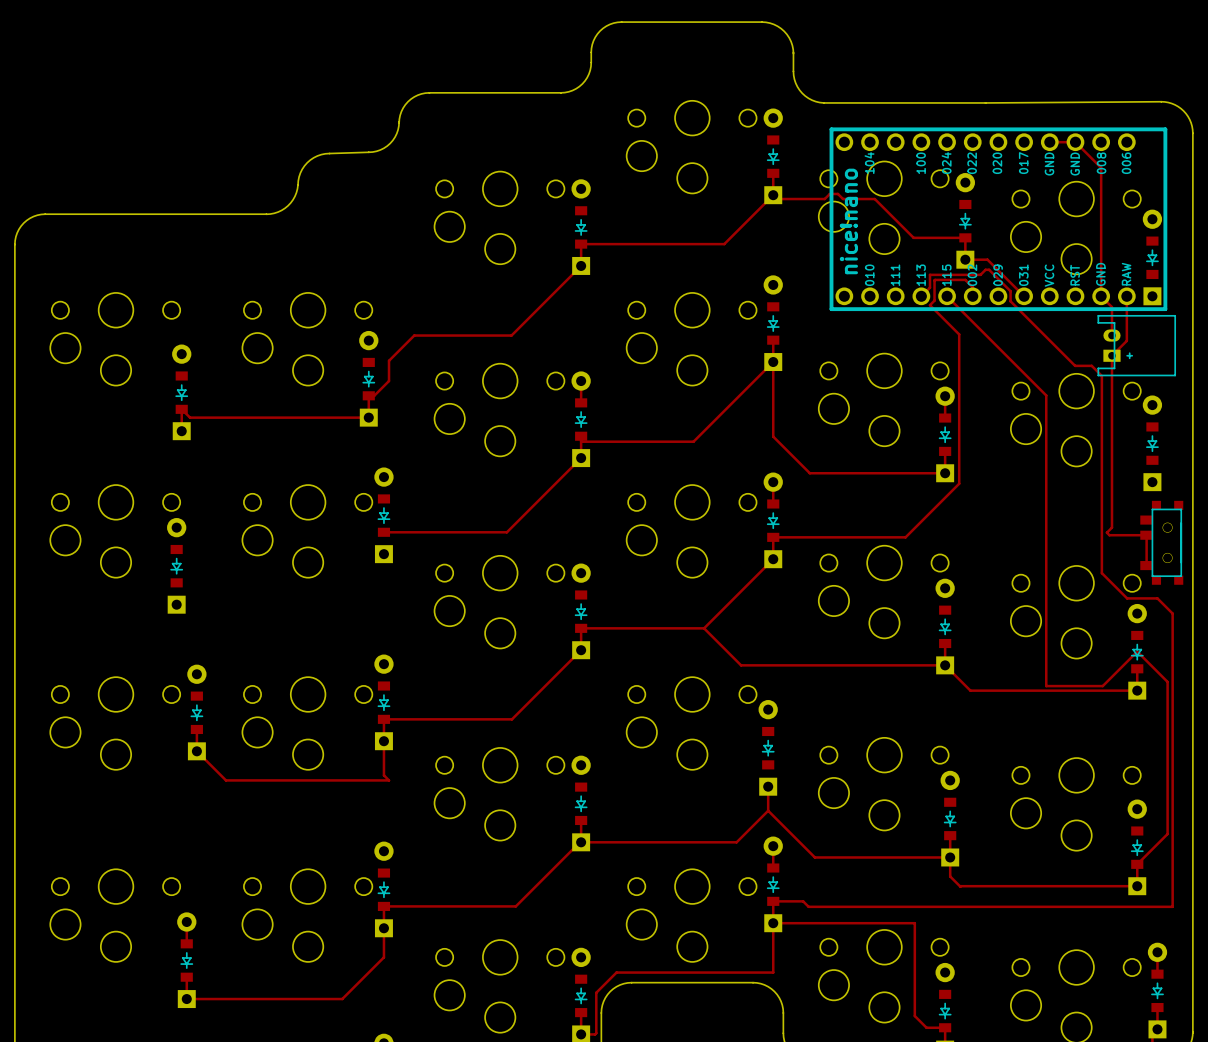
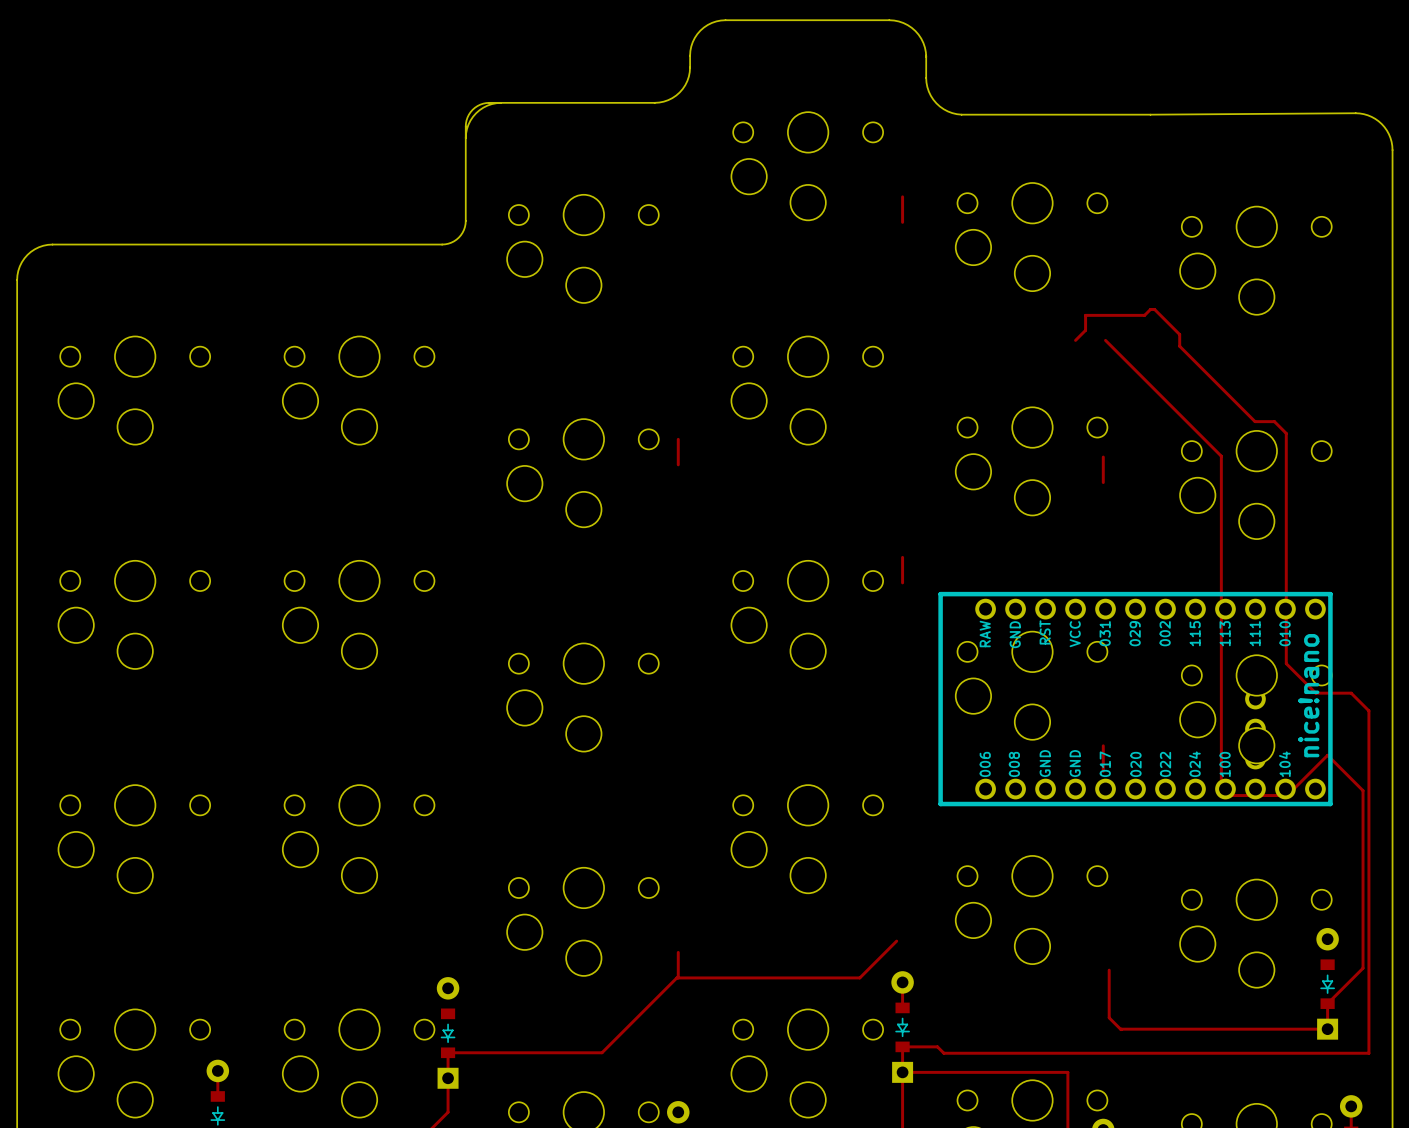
board edge: (399, 121) (396, 133) (392, 140) (380, 149) (372, 152) (325, 153) (310, 160) (300, 173) (296, 192) (290, 203) (277, 212) (266, 214) -> (501, 102) (486, 103) (477, 106) (470, 112) (466, 120) (465, 224) (462, 232) (456, 239) (442, 244) (310, 244)
track: (1049, 142) (1075, 142) (1101, 167) (1101, 296) (1111, 307) (1111, 335) -> none
part: (773, 156) -> none
part: (998, 219) -> none
part: (965, 220) -> none
part: (581, 227) -> none
part: (1152, 257) -> none
track: (972, 296) (972, 287) (965, 279) (935, 279) (934, 300) (929, 305) (959, 334) (959, 483) (905, 537) (773, 537) (773, 559) (704, 628) -> none
track: (1024, 296) (987, 259) (965, 259) (965, 237) (913, 237) (874, 199) (843, 199) (837, 193) (829, 193) (824, 199) (777, 199) (773, 195) (724, 244) (581, 244) (581, 265) (511, 335) (414, 335) (389, 360) (389, 381) (374, 395) (368, 395) (368, 417) (190, 417) (181, 409) (181, 431) -> none
track: (1126, 296) (1126, 340) (1111, 355) (1111, 527) (1106, 532) (1109, 535) (1146, 535) (1146, 565) -> none
part: (773, 323) -> none
track: (773, 340) (773, 436) (809, 473) (945, 473) (945, 451) -> none
part: (1136, 345) -> none
track: (773, 362) (693, 441) (581, 441) -> none
part: (368, 378) -> none
part: (181, 392) -> none
part: (581, 419) -> none
part: (945, 434) -> none
track: (581, 436) (581, 458) (506, 532) (383, 532) -> none
part: (1152, 443) -> none
part: (383, 515) -> none
part: (773, 520) -> none
part: (1161, 542) -> none
part: (176, 565) -> none
part: none -> (1135, 699)
part: (581, 611) -> none
part: (945, 626) -> none
track: (704, 628) (741, 665) (945, 665) (970, 690) (1137, 690) (1137, 668) -> none
track: (704, 628) (581, 628) (581, 650) (511, 719) (383, 719) (383, 775) (389, 780) (226, 780) (196, 751) (196, 729) -> none
part: (1137, 651) -> none
part: (383, 702) -> none
part: (196, 712) -> none
part: (768, 747) -> none
track: (768, 786) (768, 810) (814, 857) (950, 857) -> none
part: (581, 803) -> none
part: (950, 818) -> none

